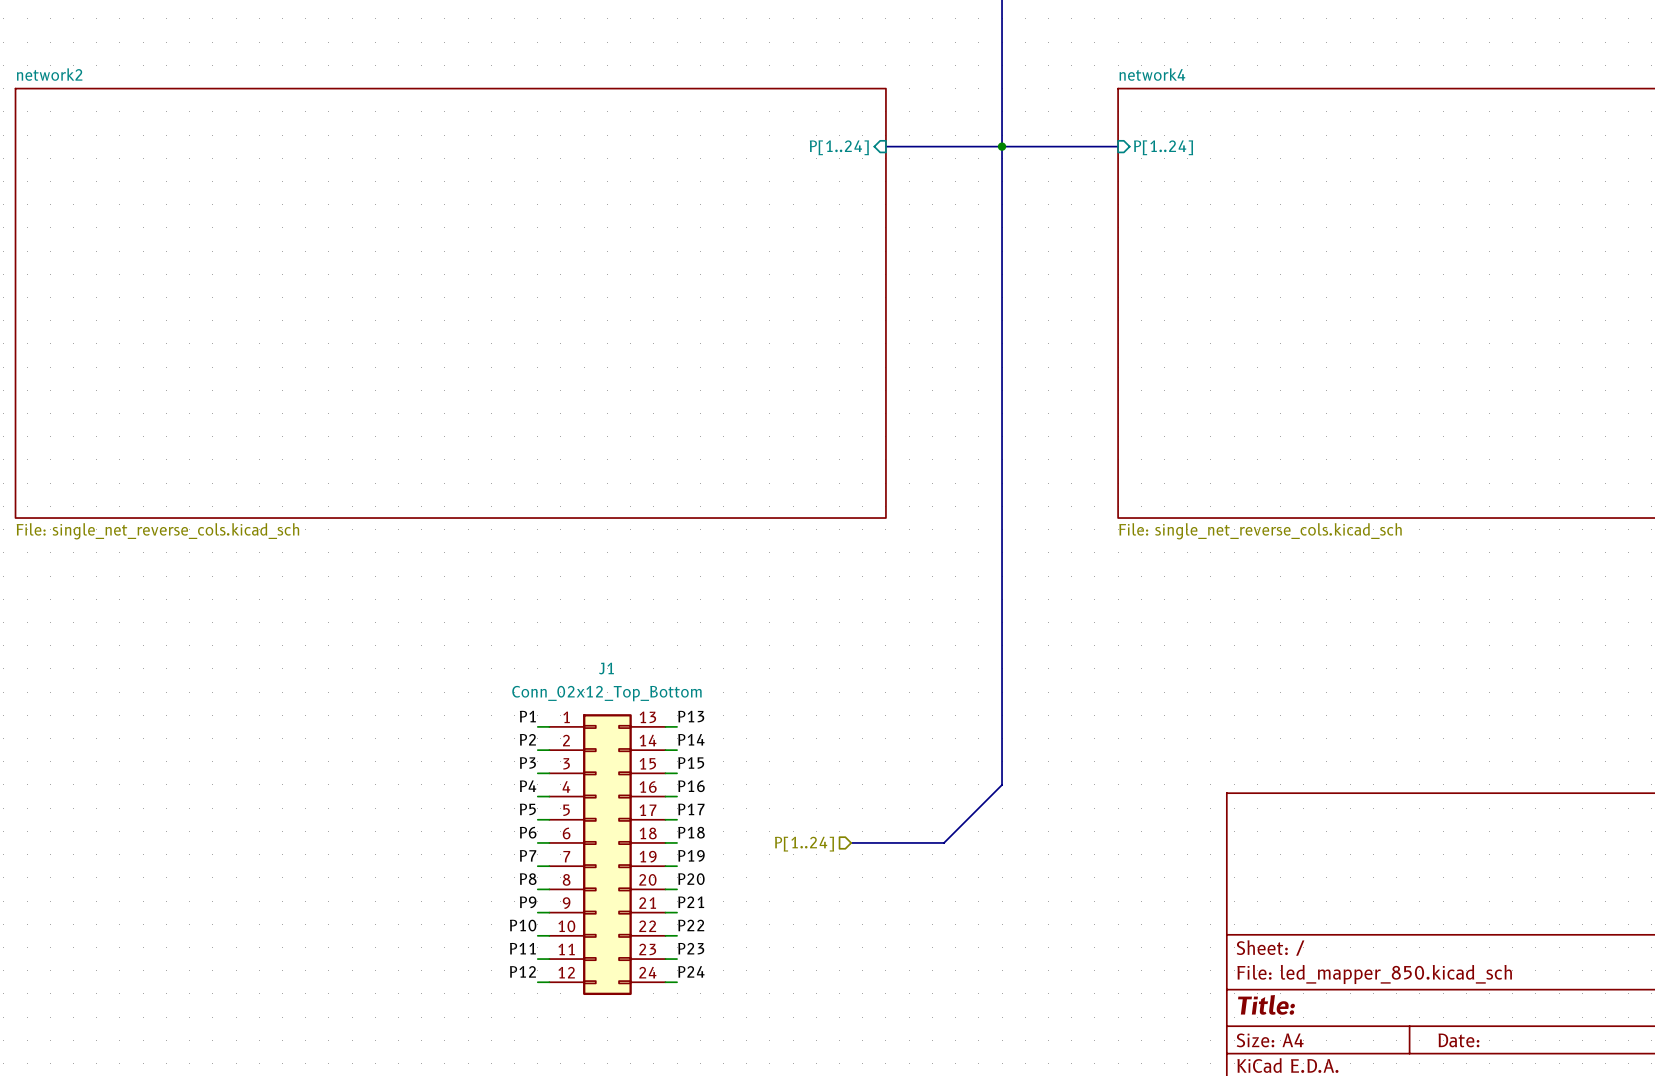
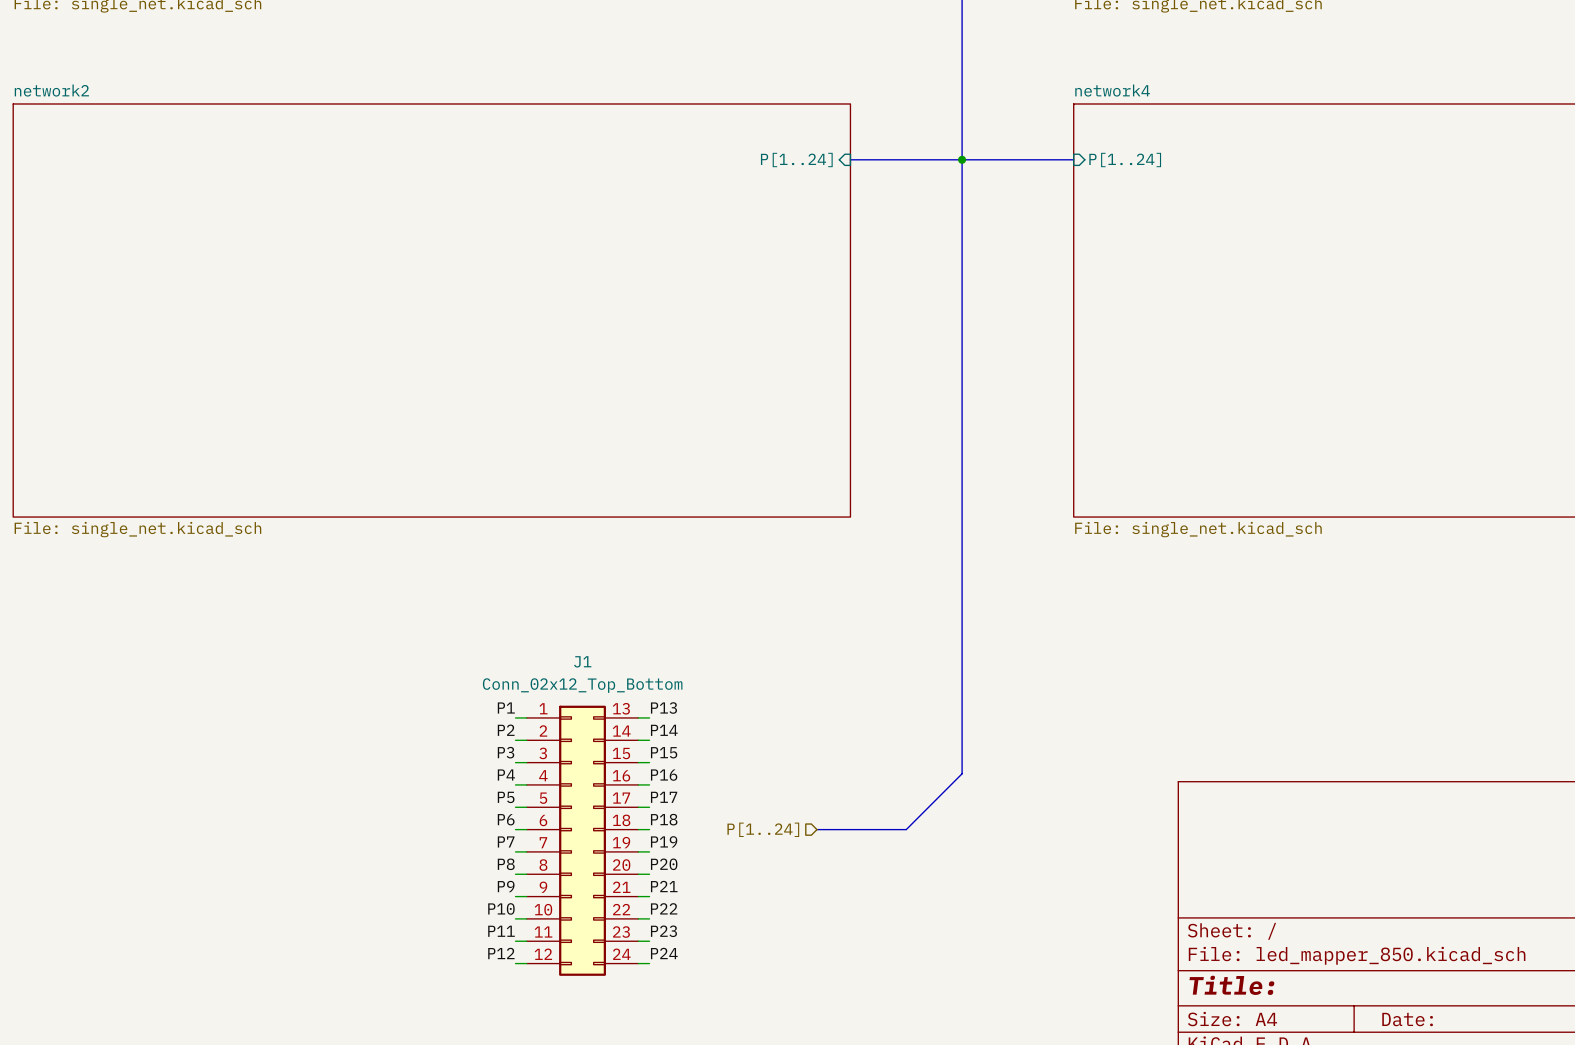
sheet network2 value: File: single_net_reverse_cols.kicad_sch (157, 531) -> File: single_net.kicad_sch (137, 529)
sheet network4 value: File: single_net_reverse_cols.kicad_sch (1260, 531) -> File: single_net.kicad_sch (1198, 529)

